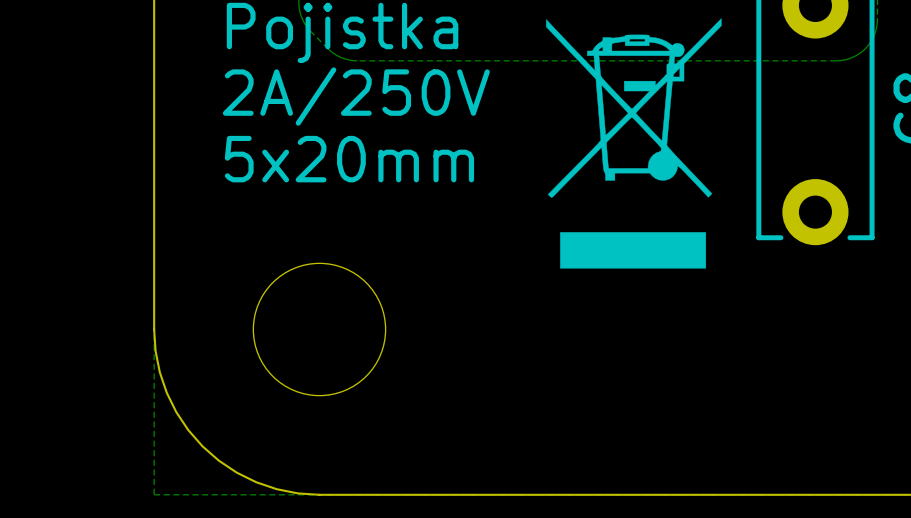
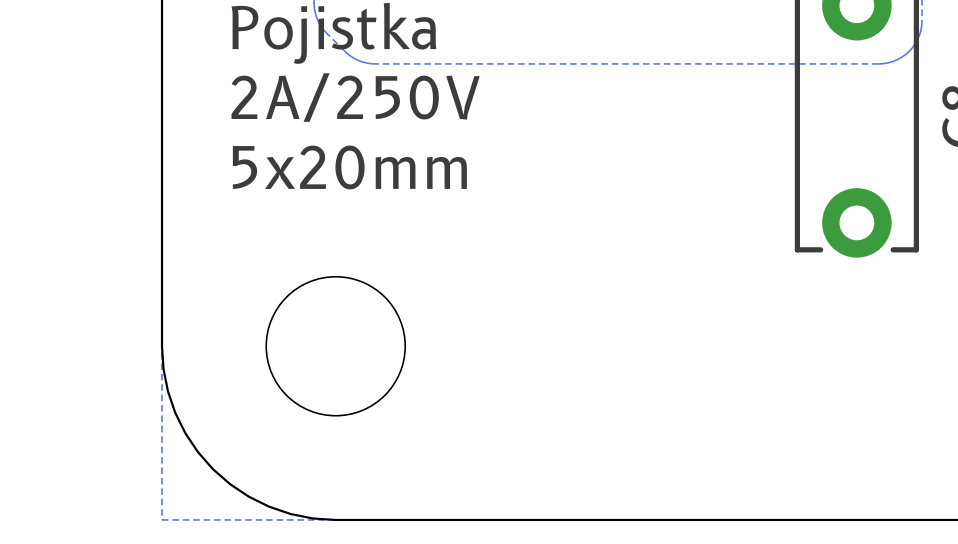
drawing: [546, 18, 722, 269] -> none

